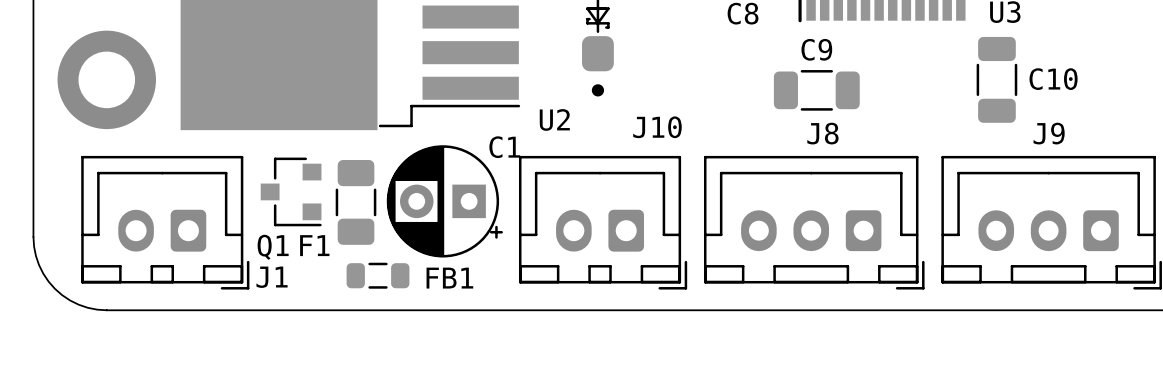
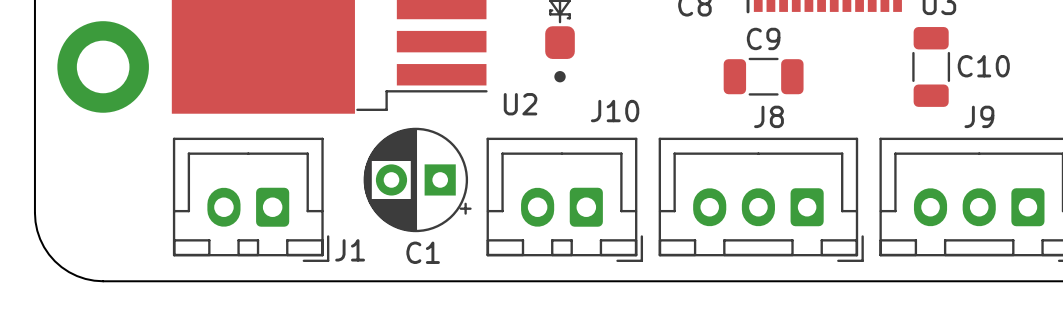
C1 name position: C1 (504, 147) -> C1 (423, 252)
Q1: (291, 191) -> none
F1: (356, 202) -> none
J1 position: (165, 222) -> (251, 199)
FB1: (378, 275) -> none

